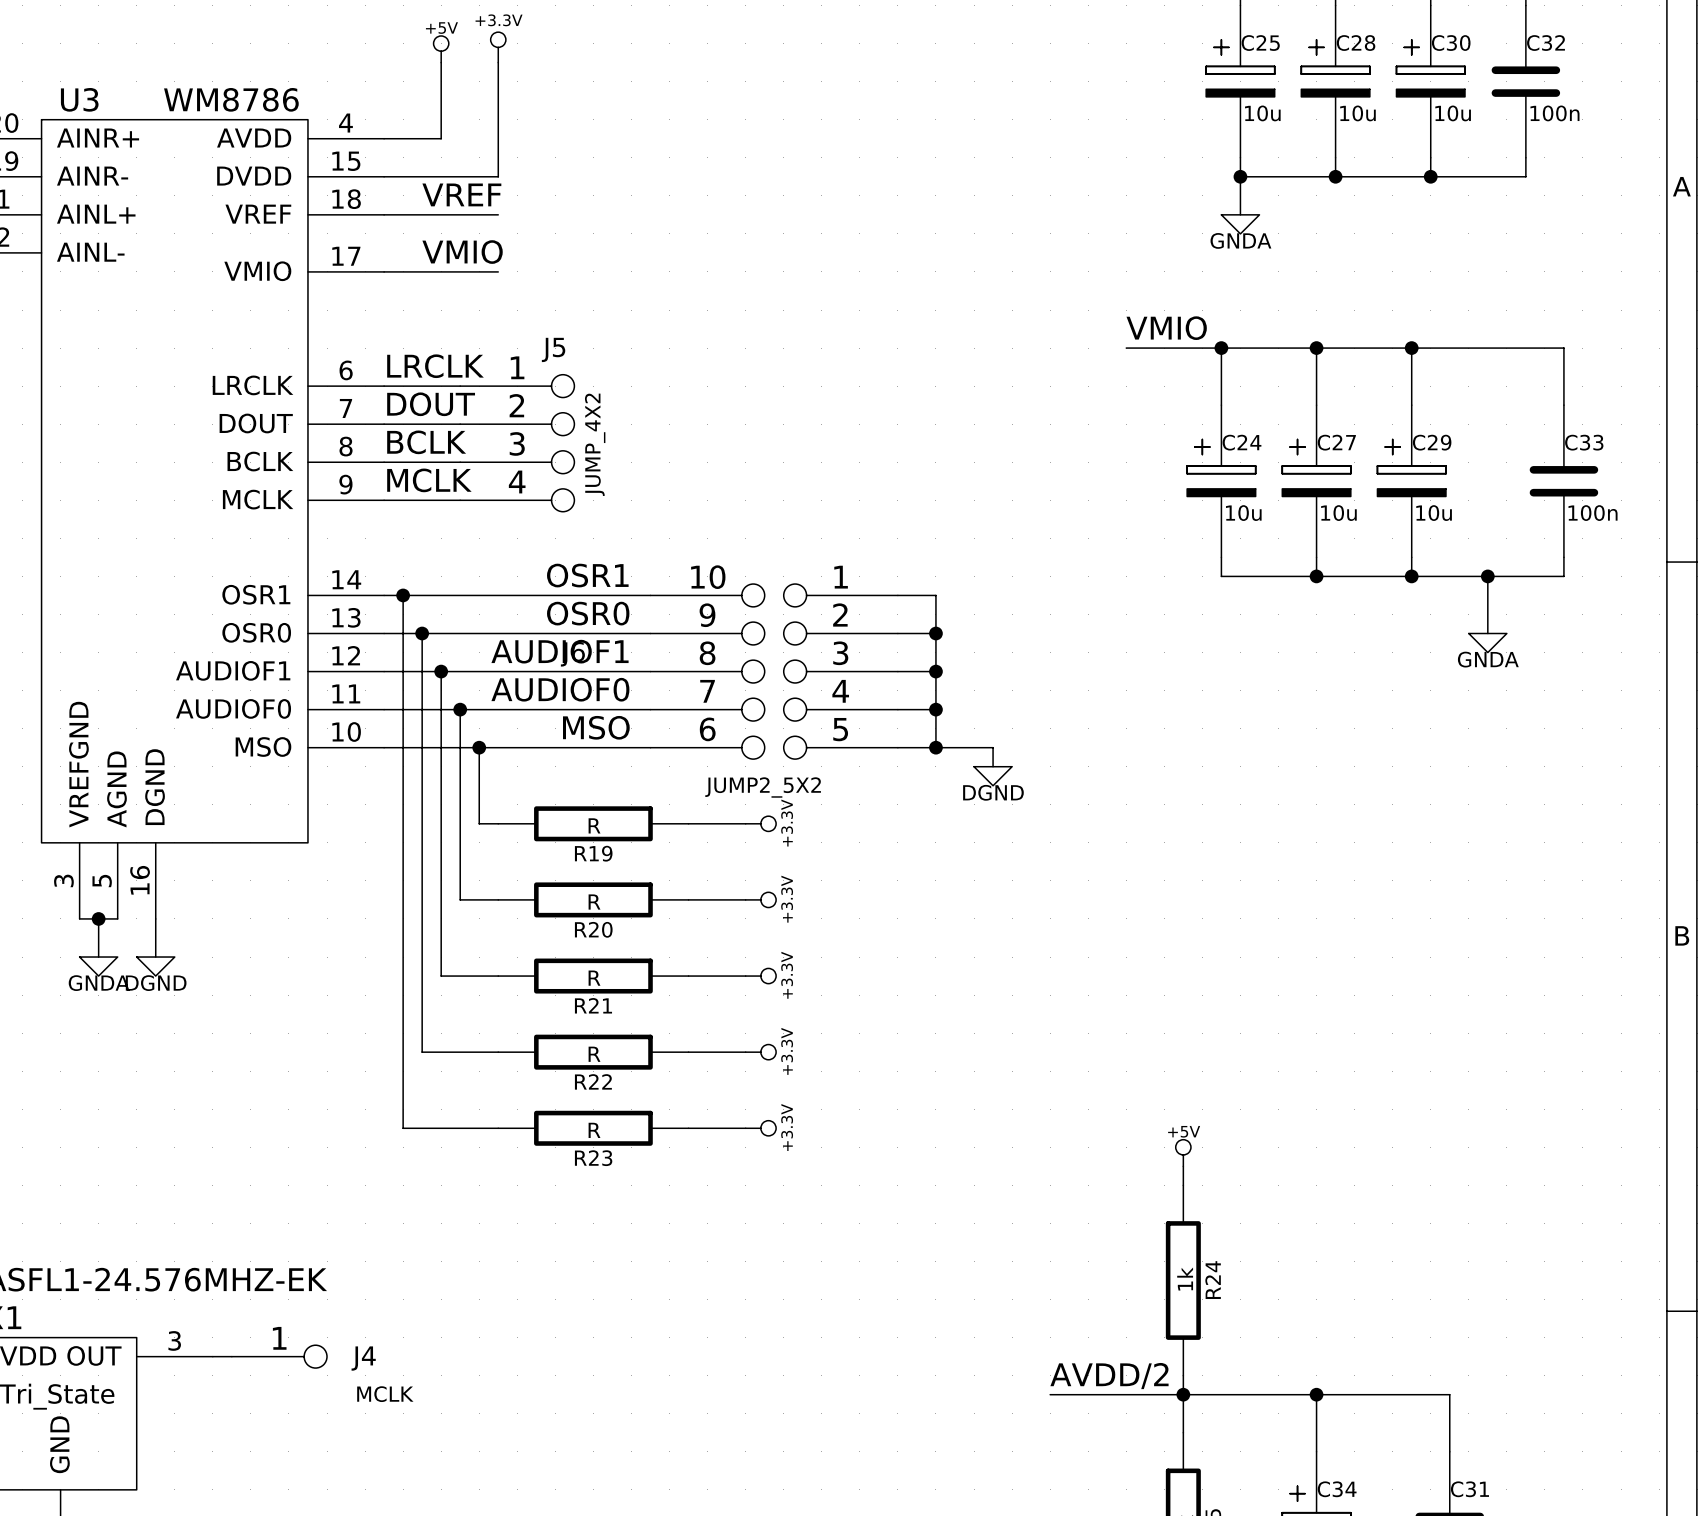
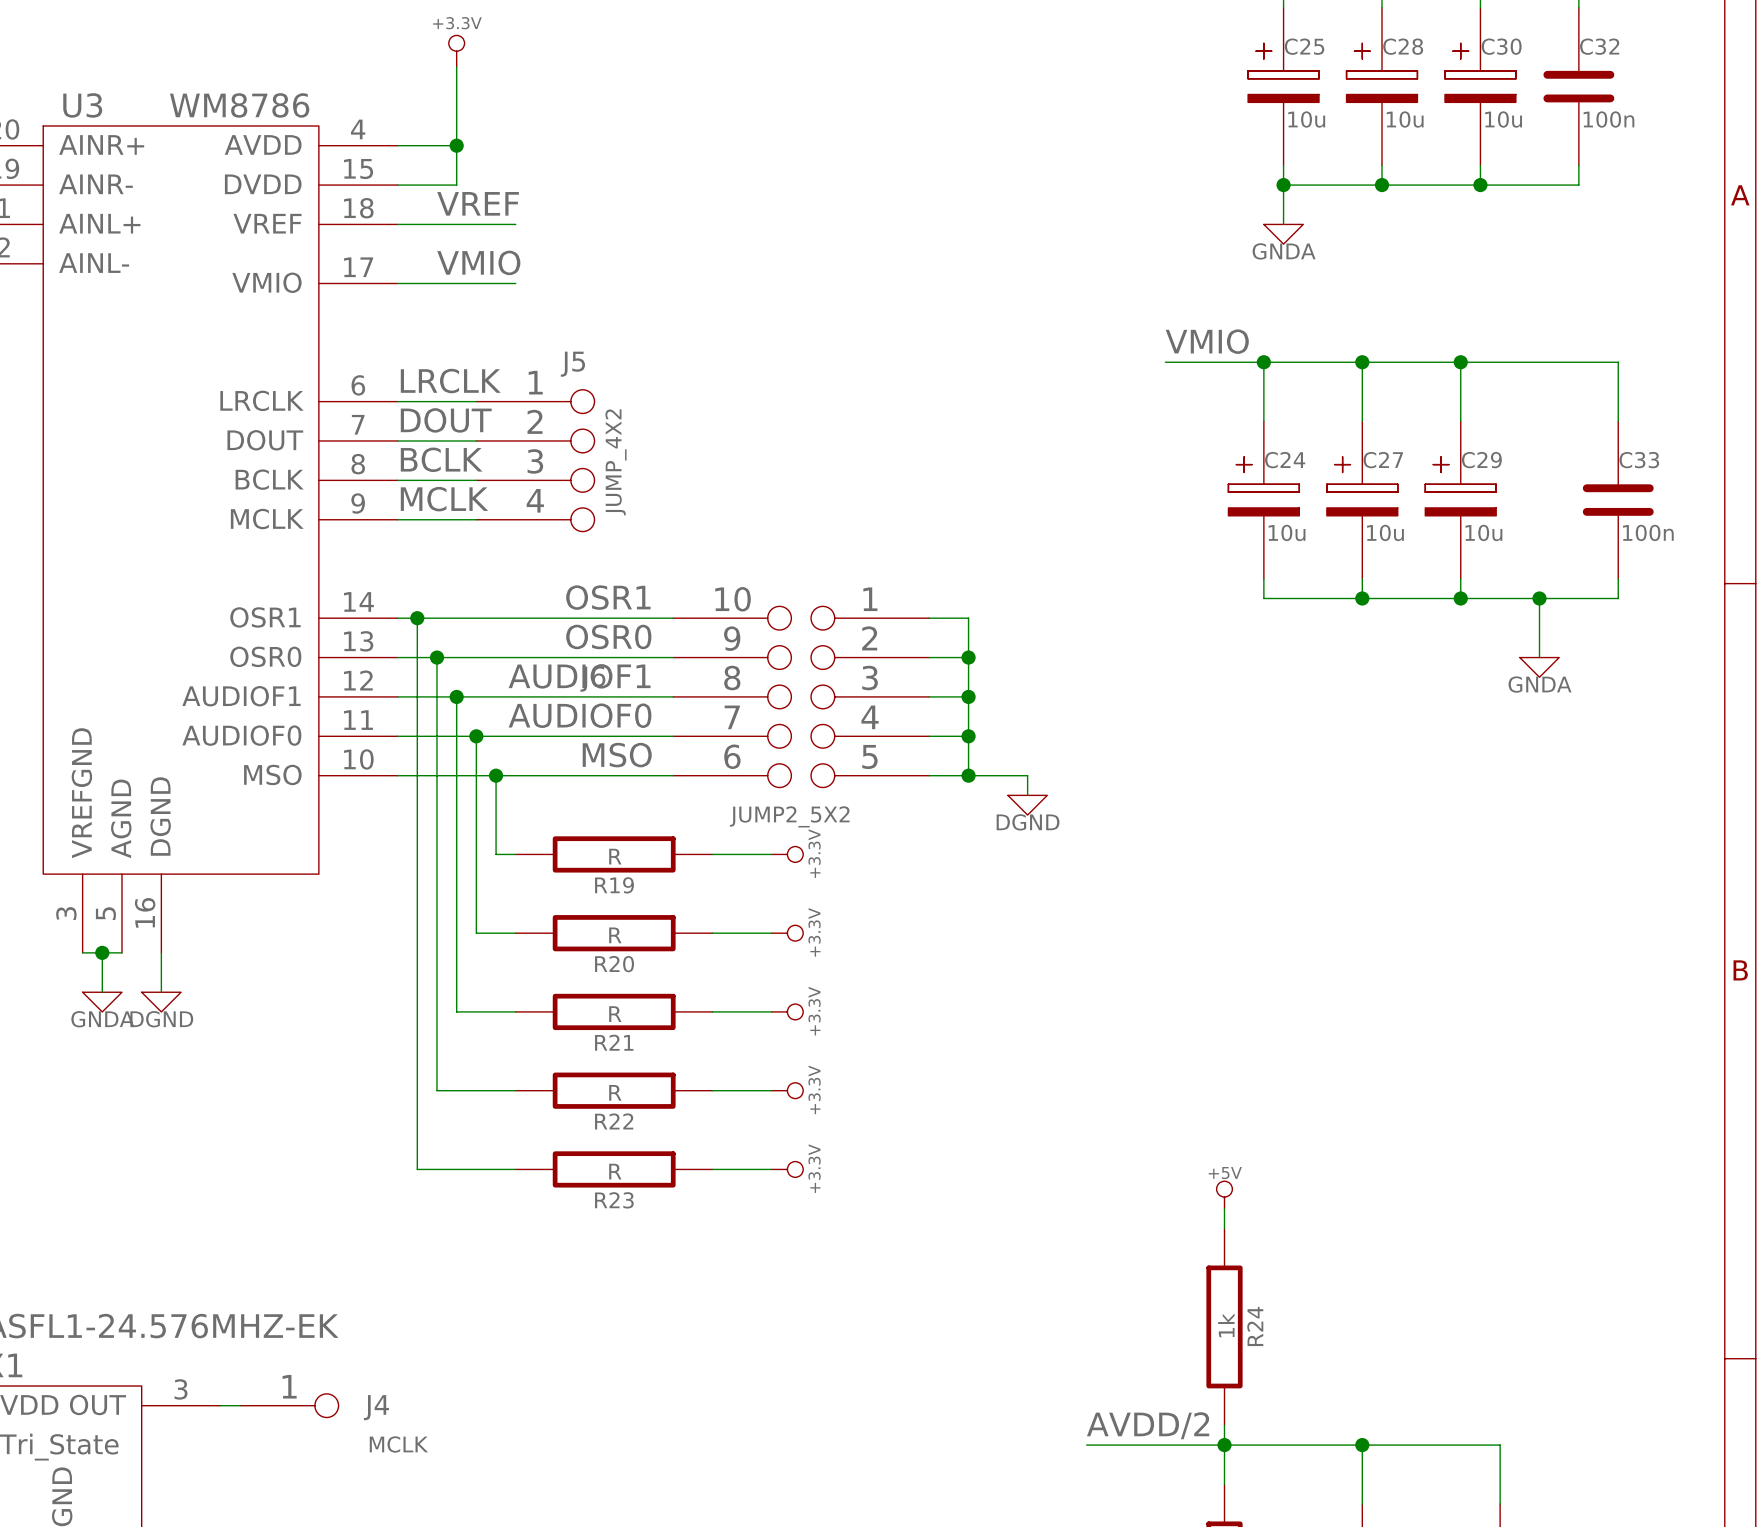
power symbol: +3.3V (498, 47) -> none
power symbol: +5V (441, 49) -> +3.3V (456, 51)
wire: (498, 62) (498, 176) (441, 176) -> (456, 145) (456, 185)
junction: none -> (456, 145)

